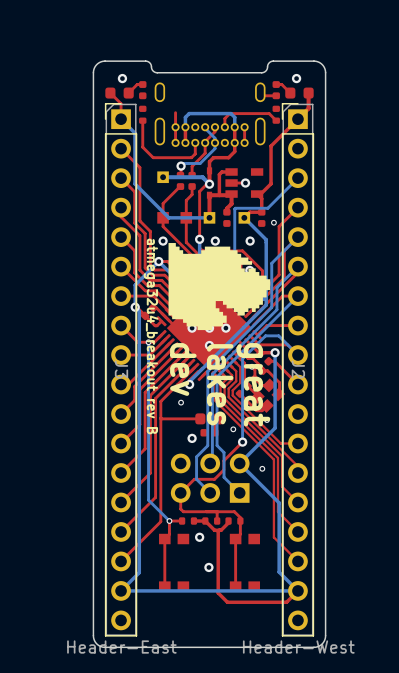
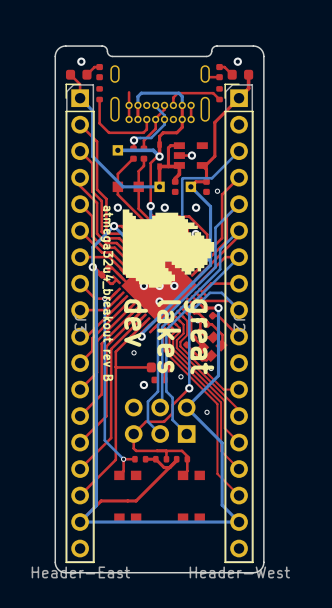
top track: none -> (176, 460) (136, 500) (101, 500) (80, 522)
top track: (219, 530) (218, 592) (227, 602) (286, 602) (297, 590) -> none
via: (199, 537) -> none
top track: (164, 539) (164, 586) -> none
top track: (235, 539) (235, 586) -> none
via: (208, 567) -> none

